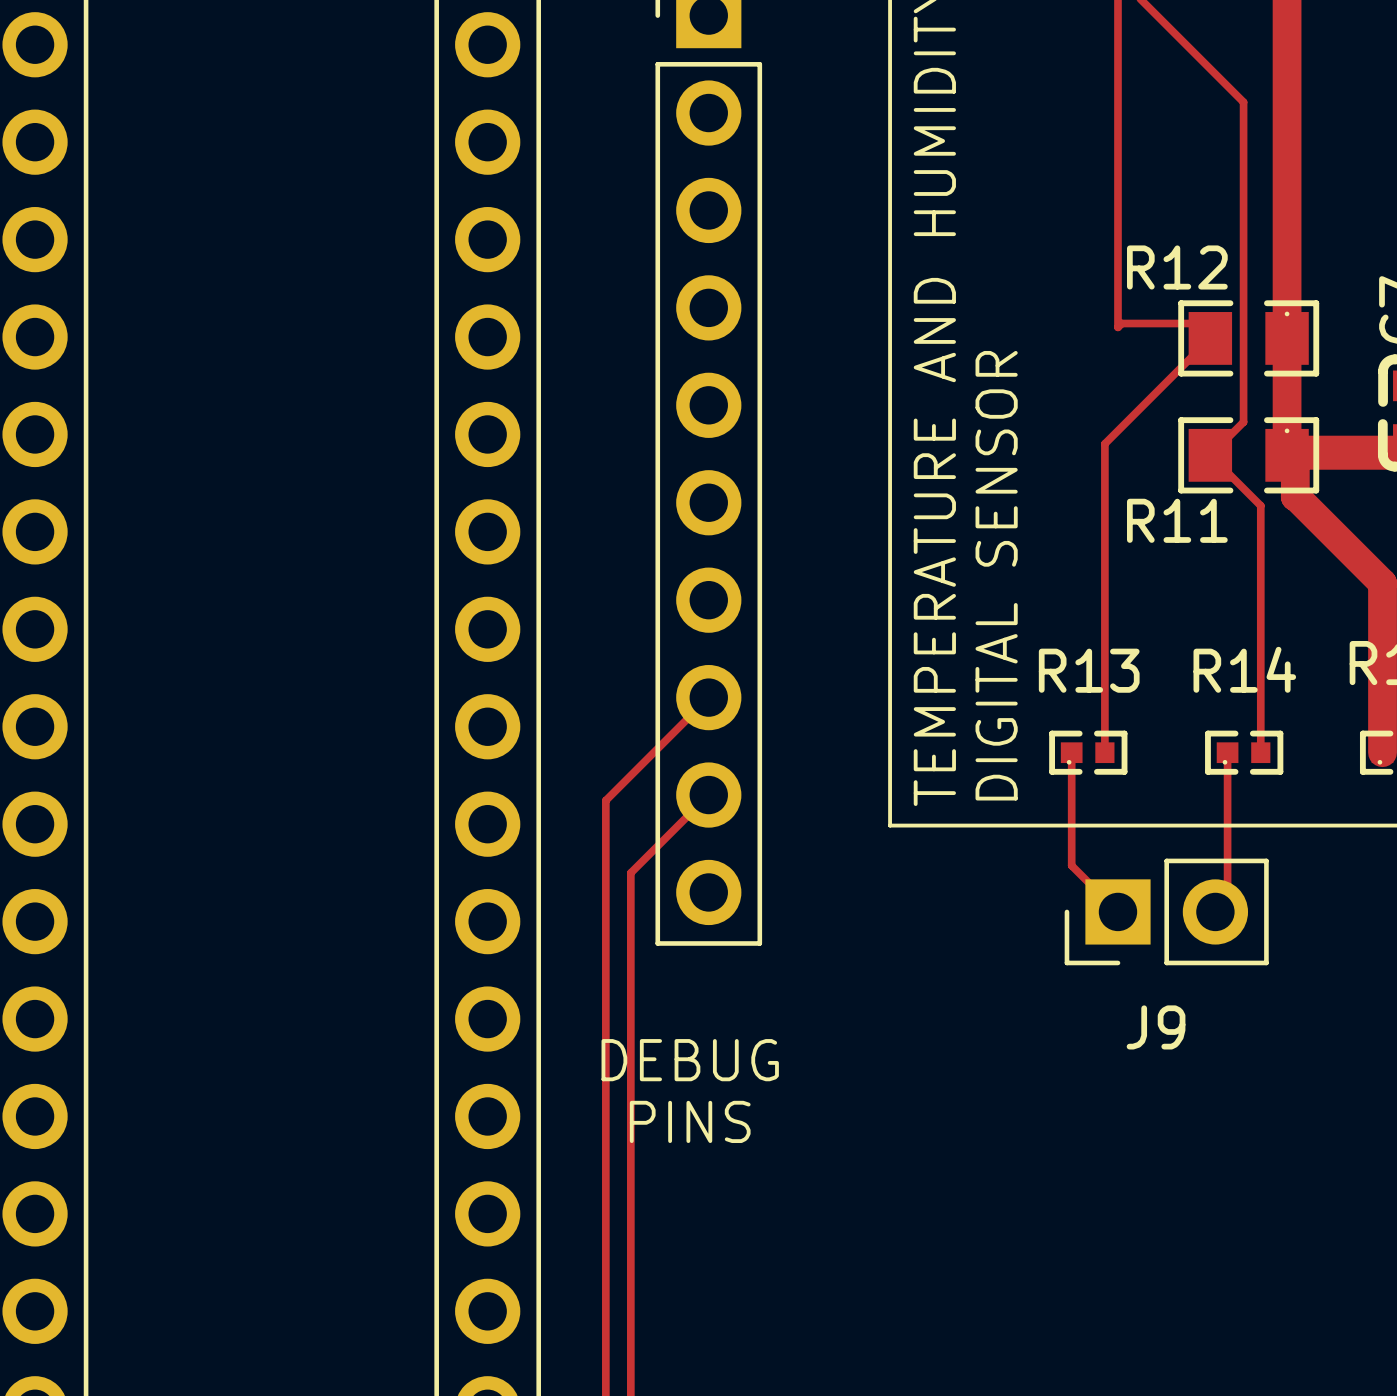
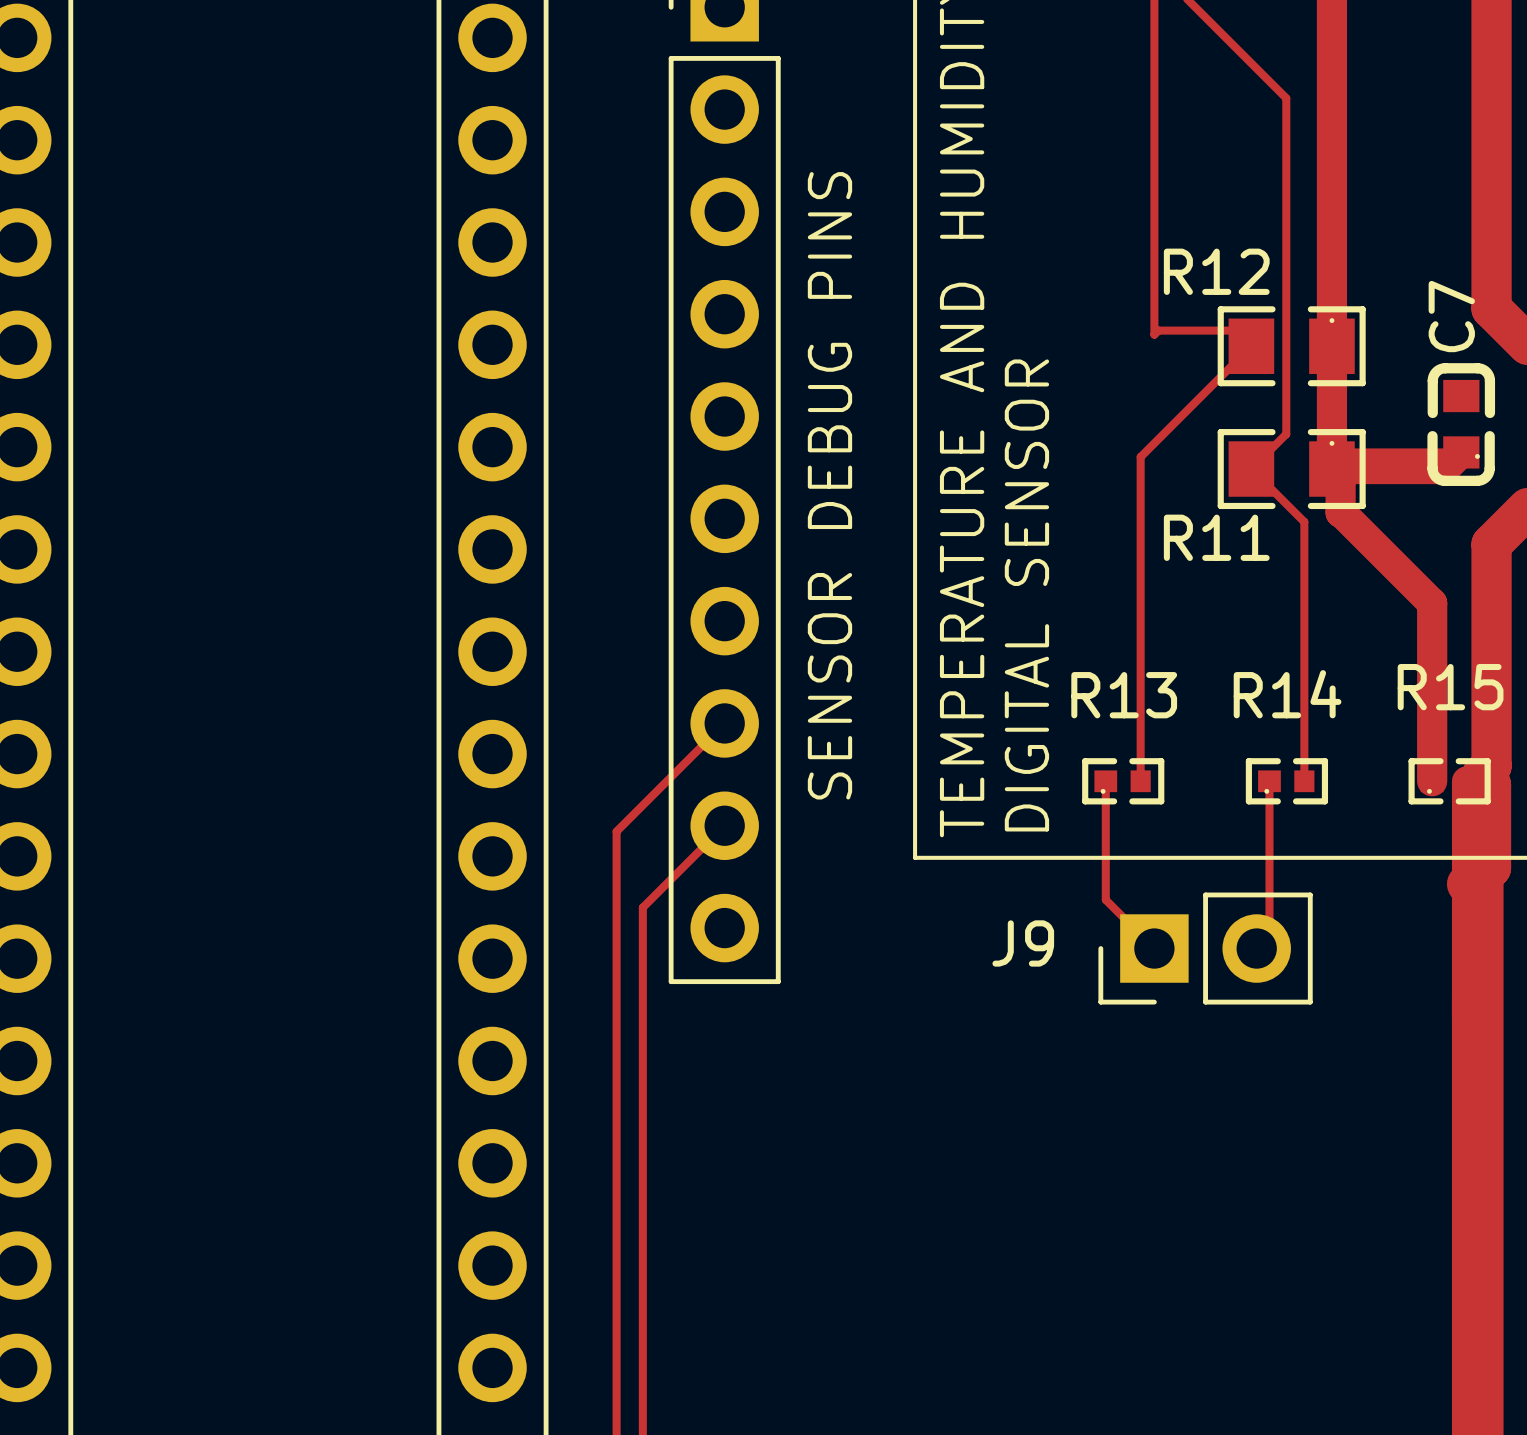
text: none -> SENSOR DEBUG PINS (829, 485)
J9 name position: J9 (1156, 1027) -> J9 (1023, 943)
text: DEBUG (690, 1060) -> none
text: PINS (690, 1121) -> none

